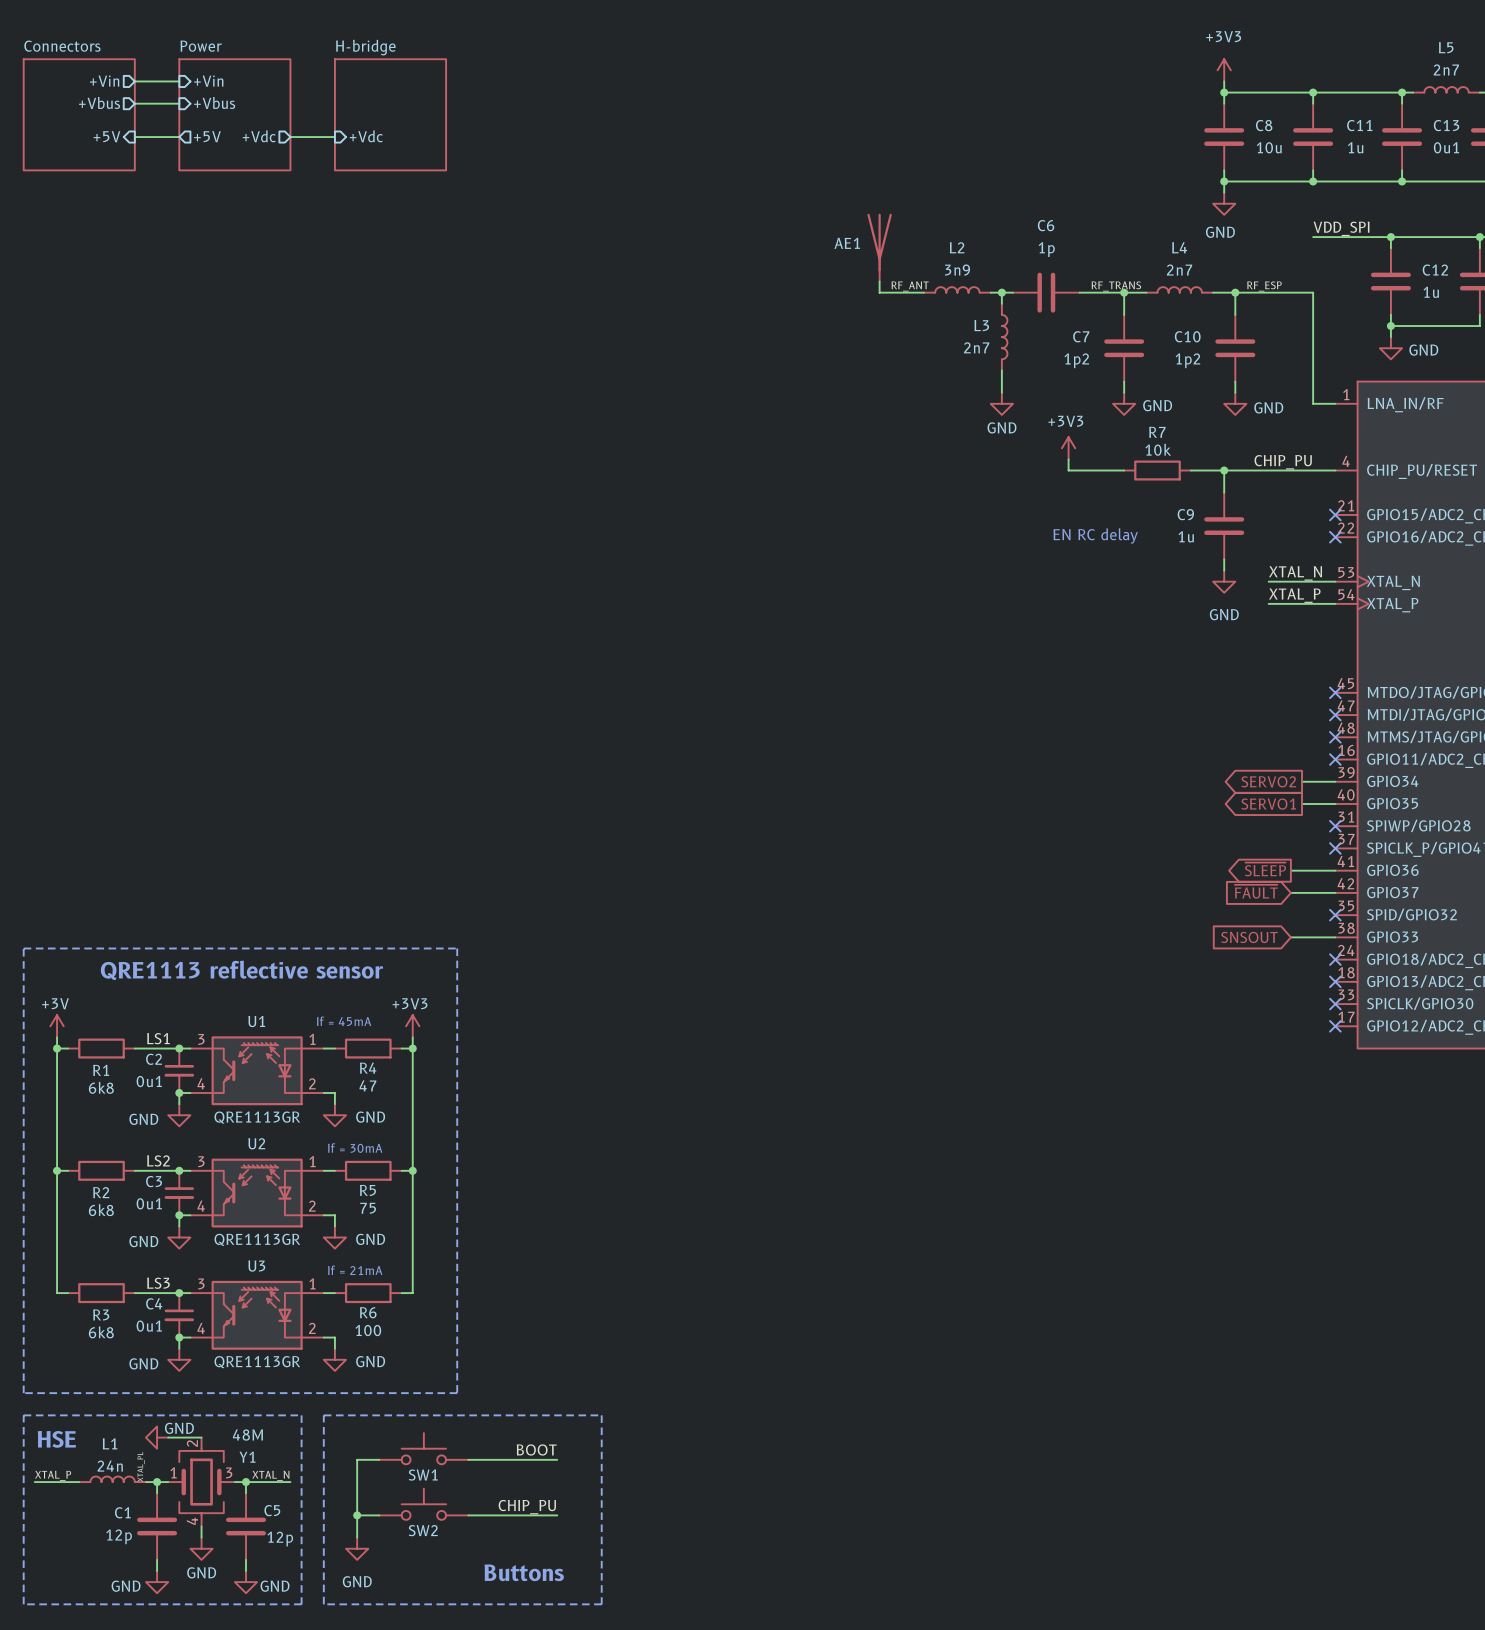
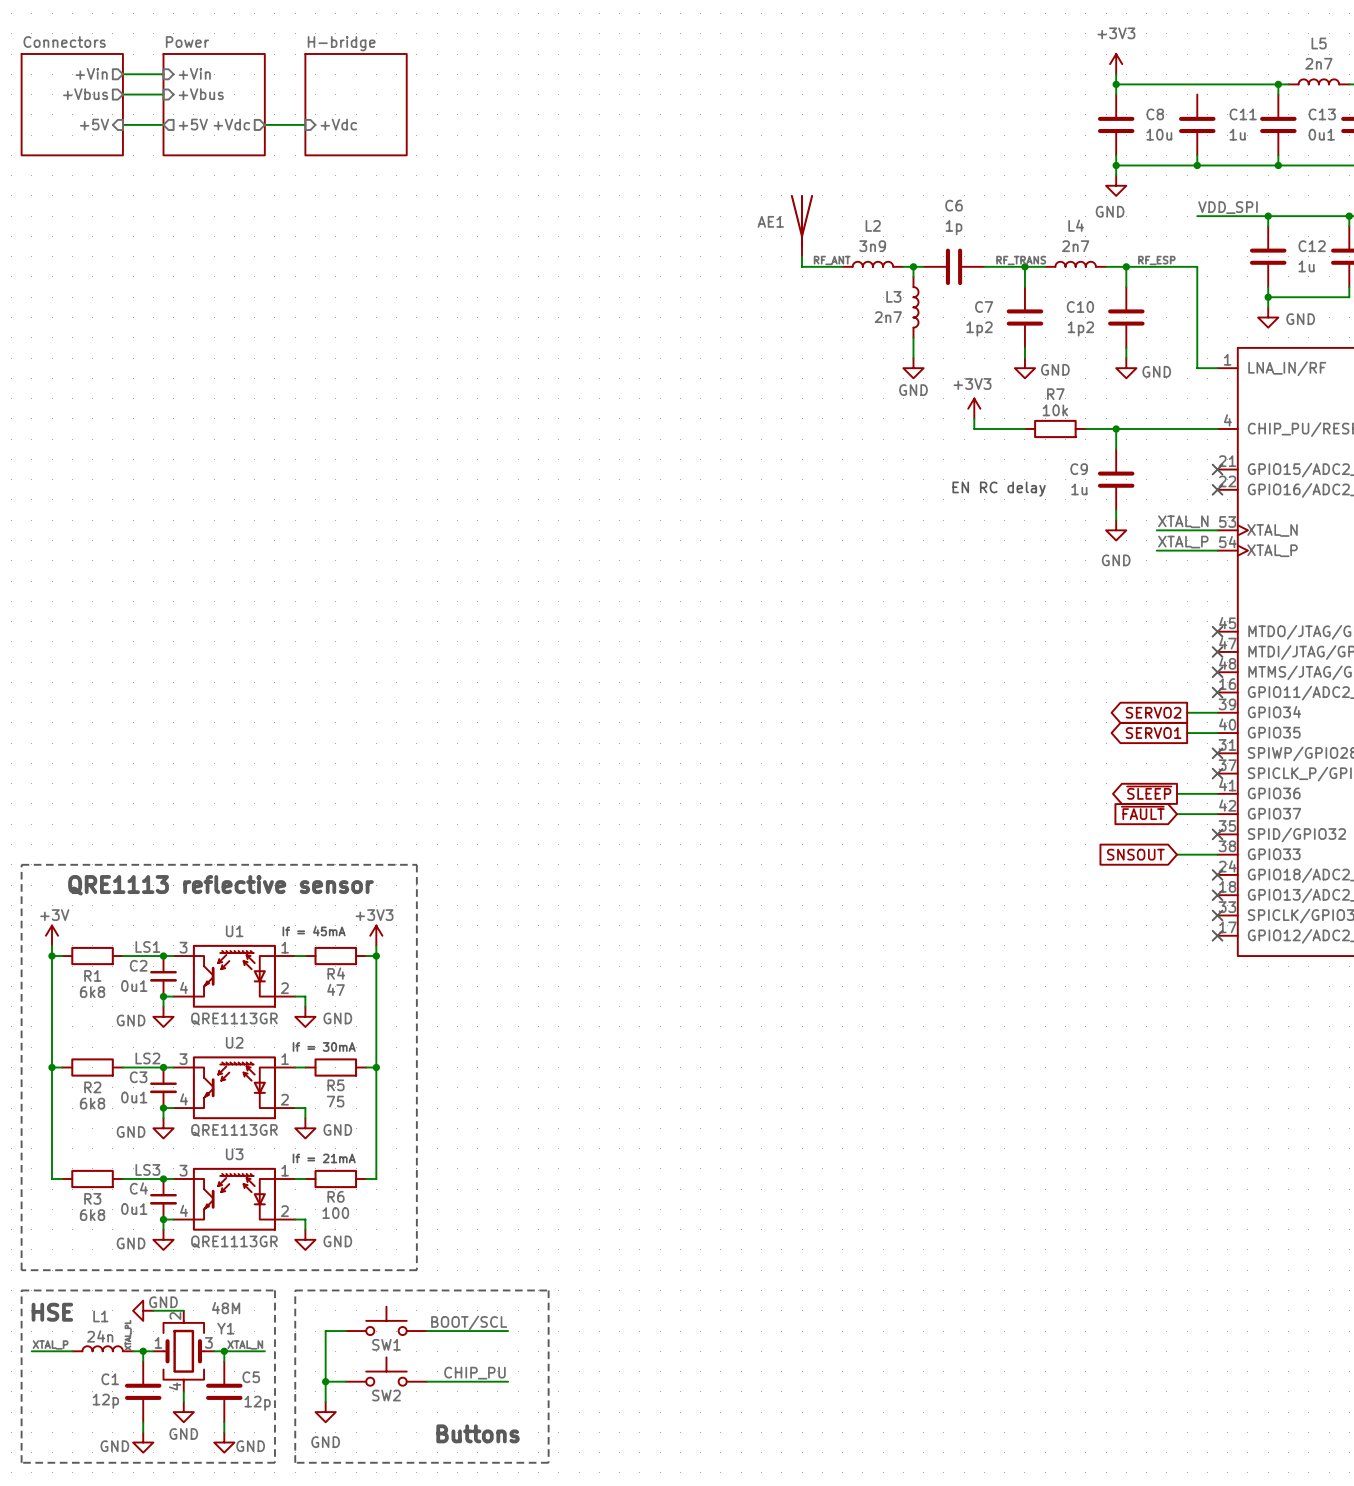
wire: (1313, 92) (1313, 103) -> none
junction: (1313, 92) -> none
label: CHIP_PU (1283, 462) -> none
label: BOOT (536, 1449) -> BOOT/SCL (469, 1322)

